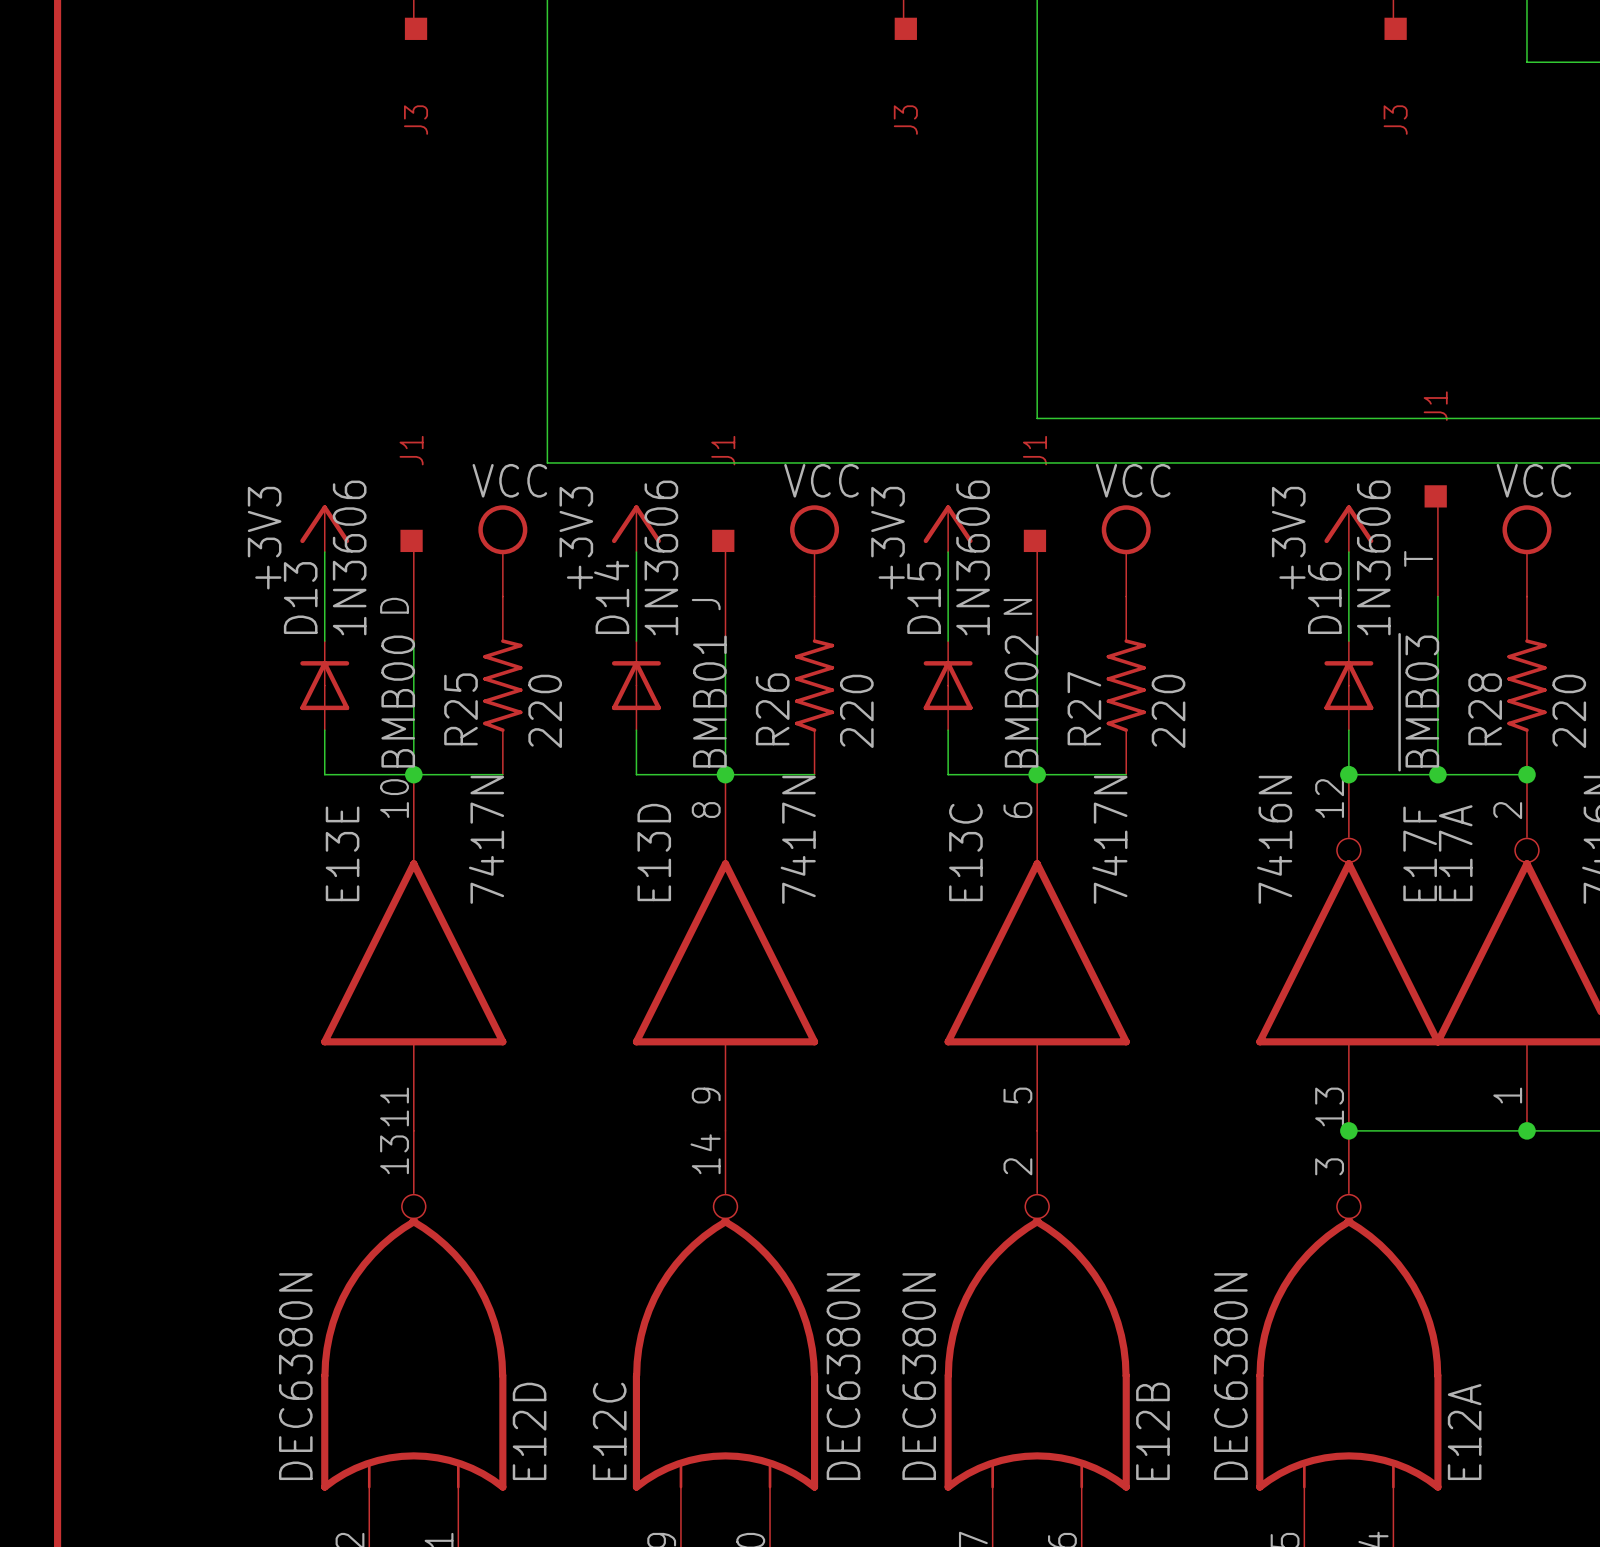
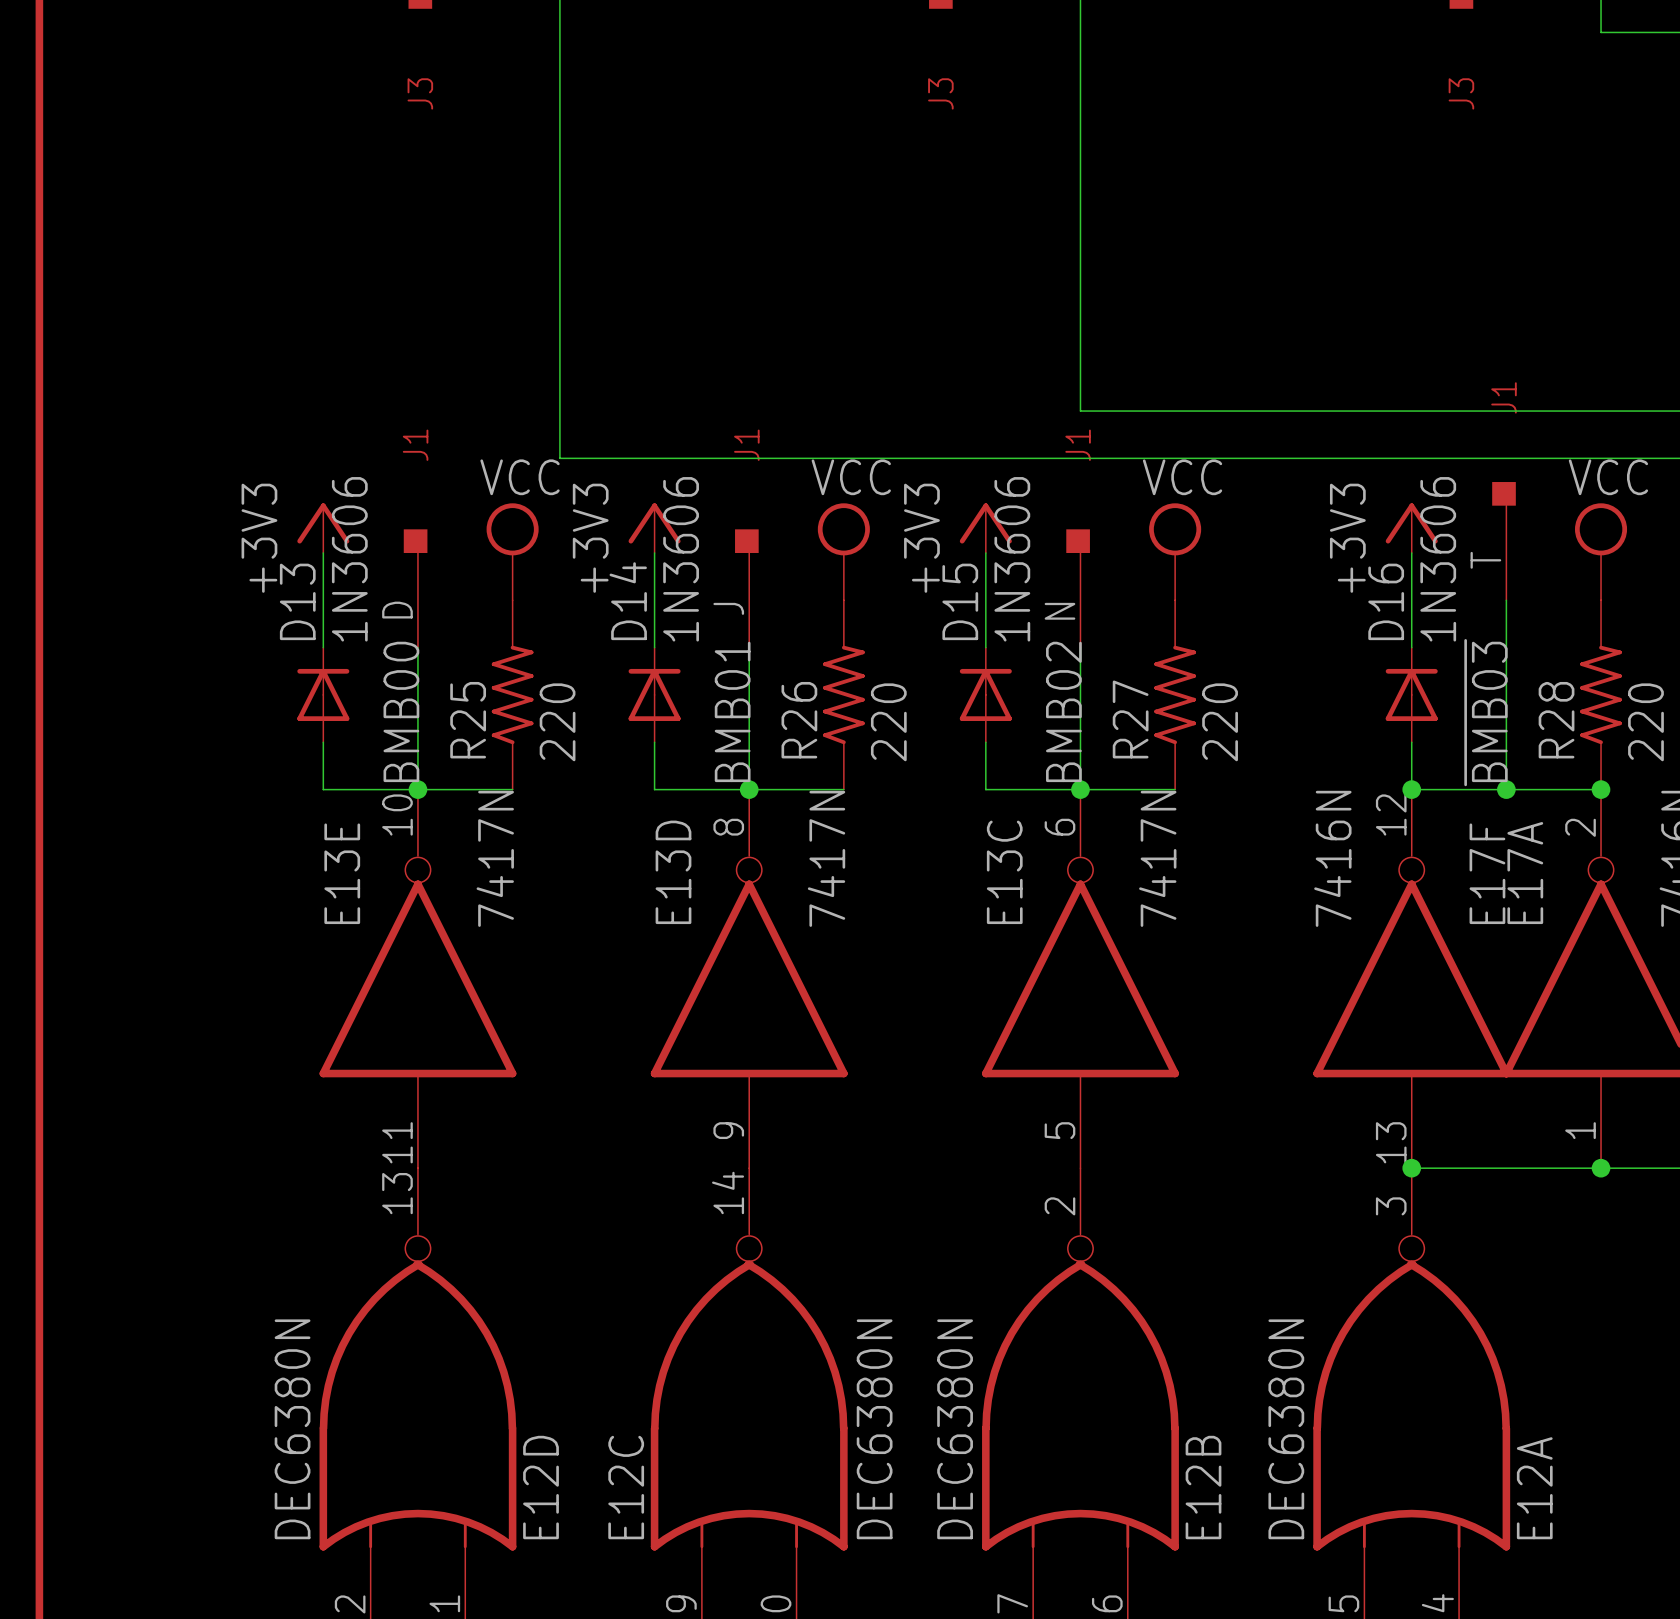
E13E symbol: [321, 774, 507, 1131] -> [319, 789, 517, 1169]
E13D symbol: [632, 774, 819, 1131] -> [650, 789, 848, 1169]
E13C symbol: [944, 774, 1130, 1131] -> [982, 789, 1179, 1169]

